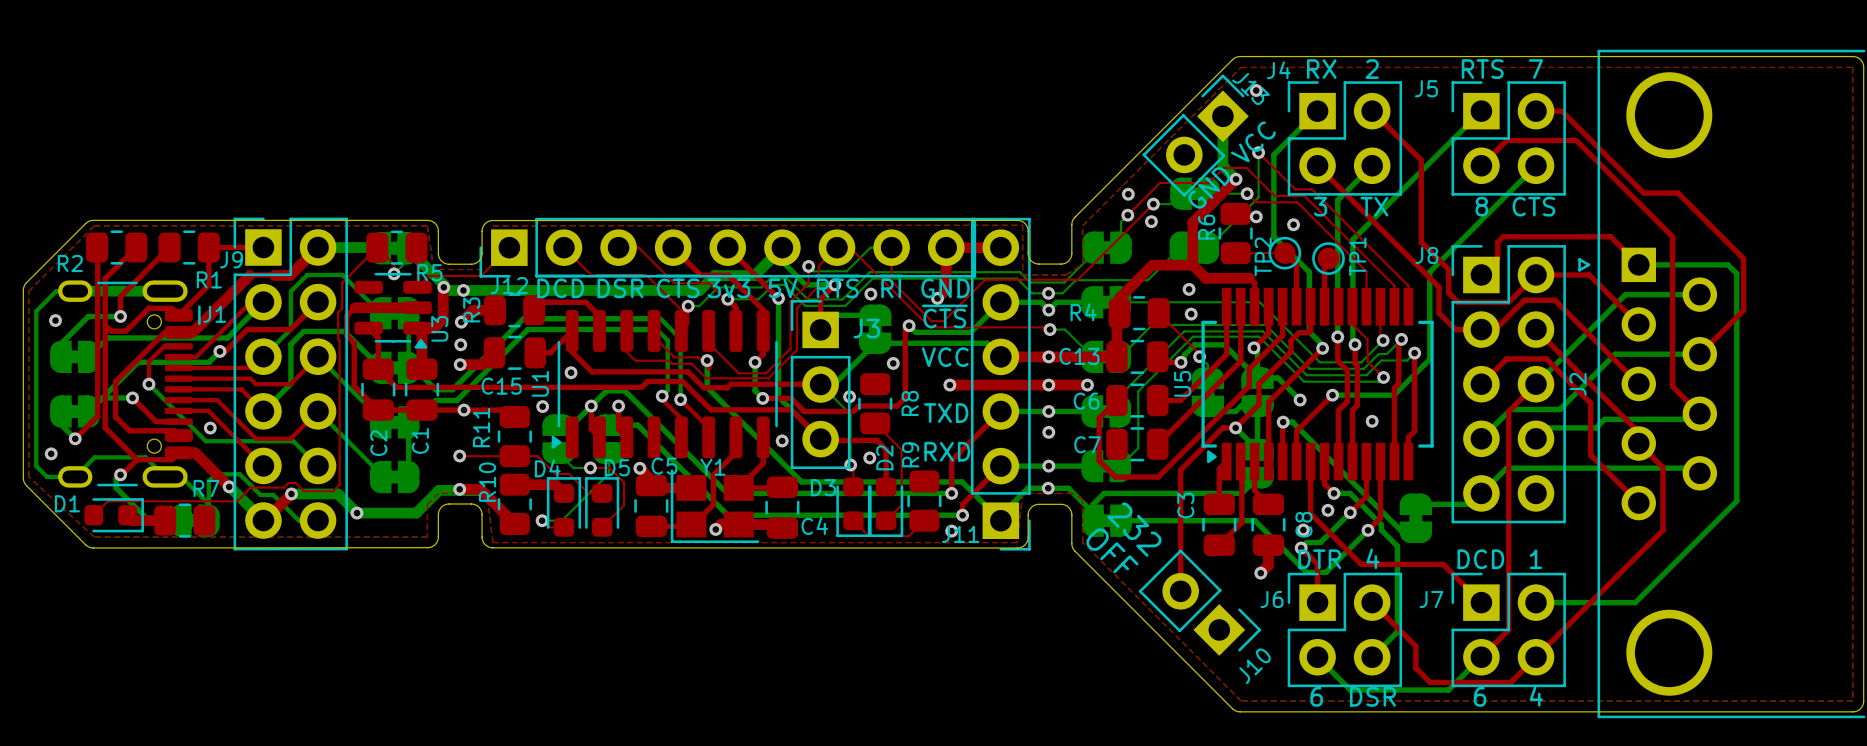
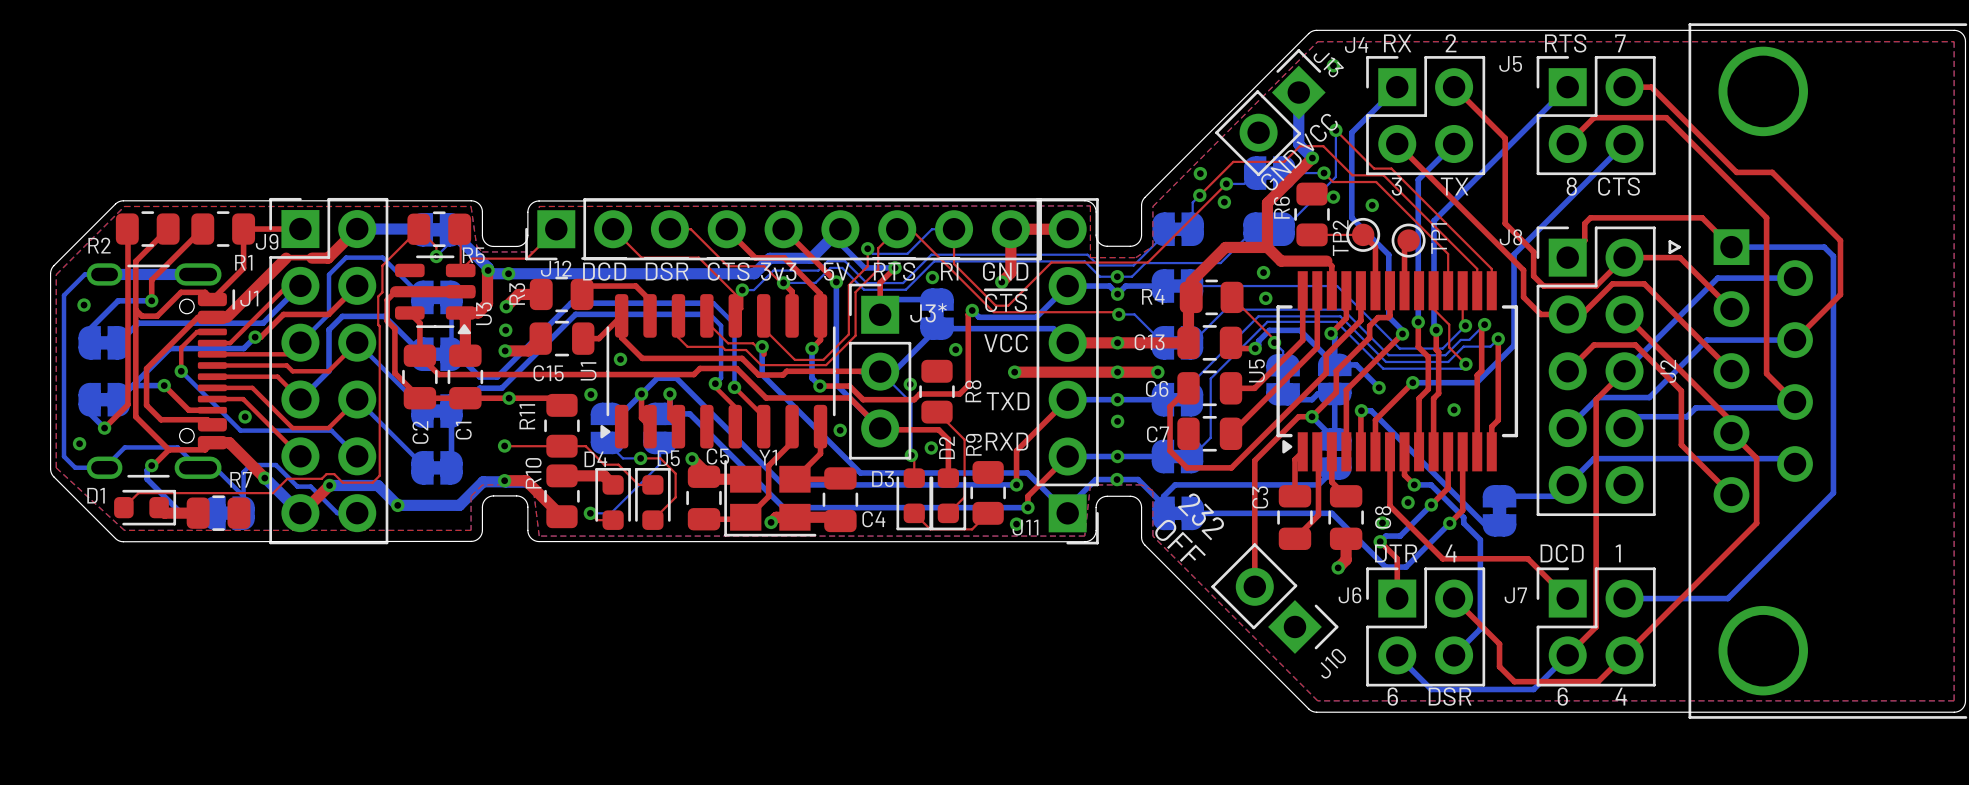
J3 name: J3 (866, 328) -> J3* (928, 312)

